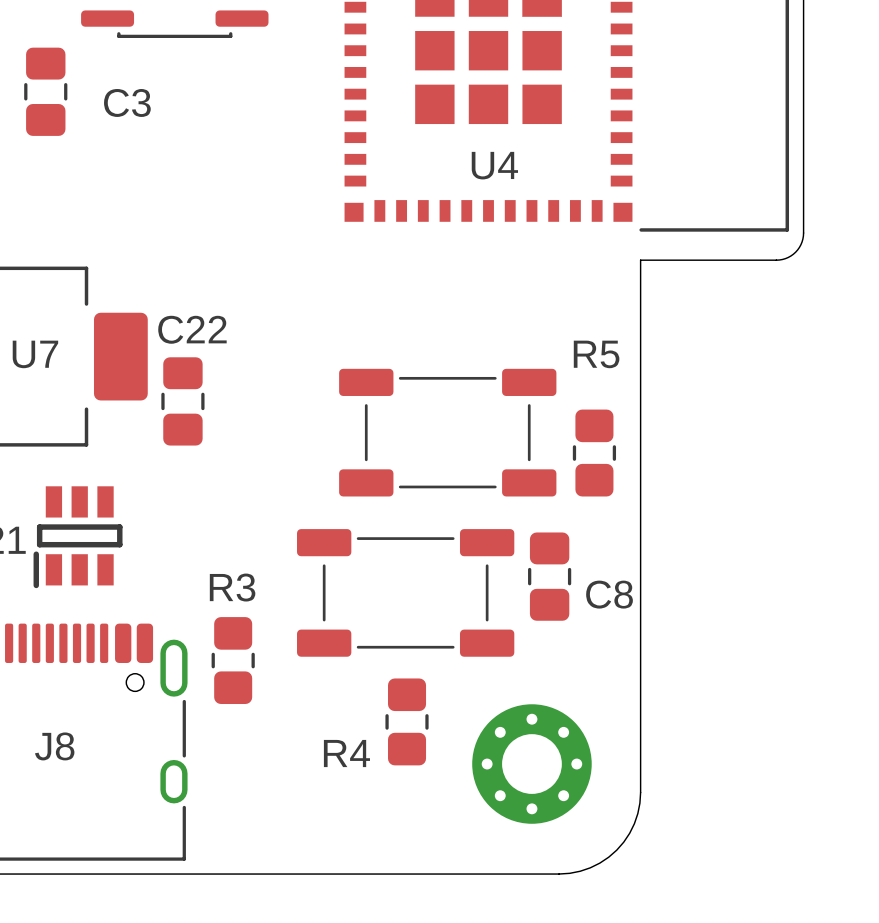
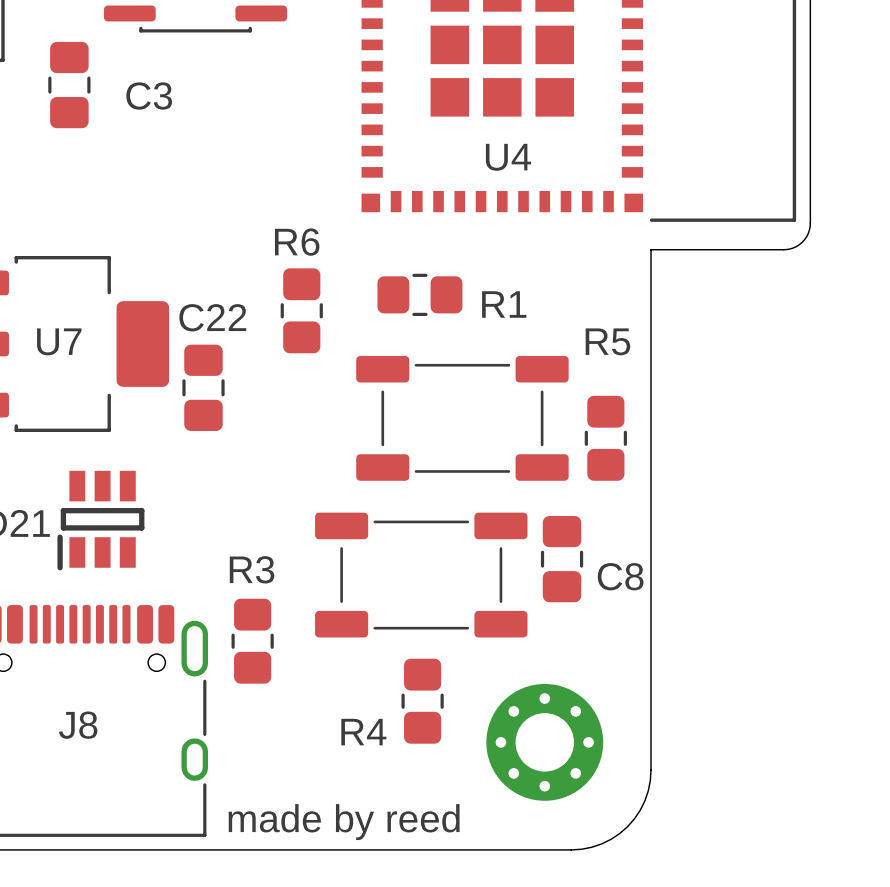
R1: none -> (419, 294)
R6: none -> (301, 310)
text: none -> made by reed (344, 822)

